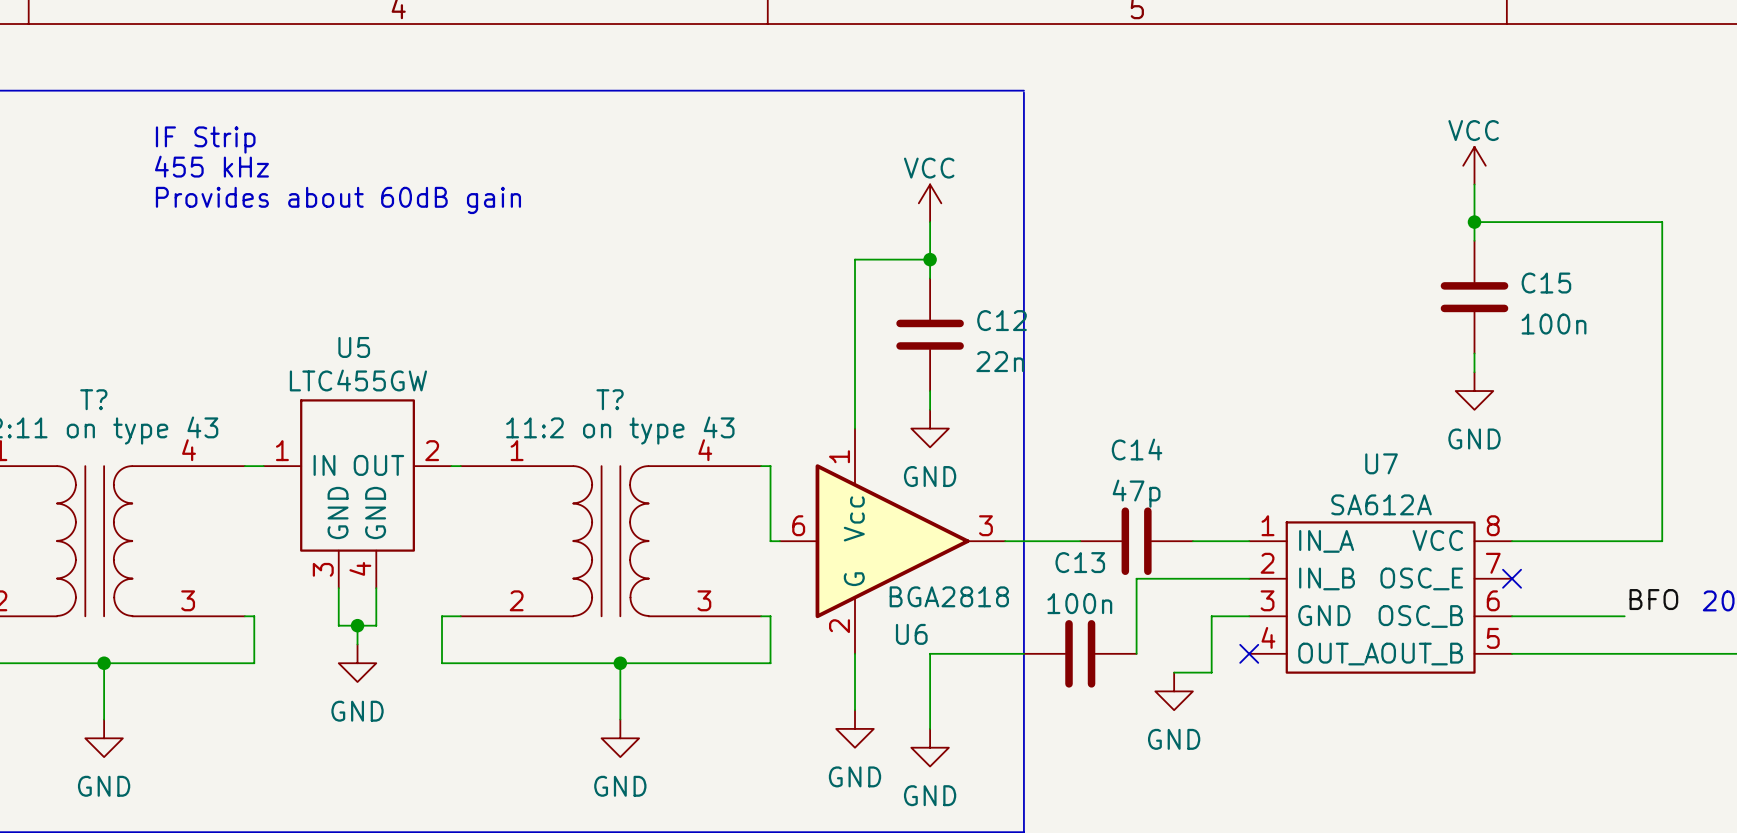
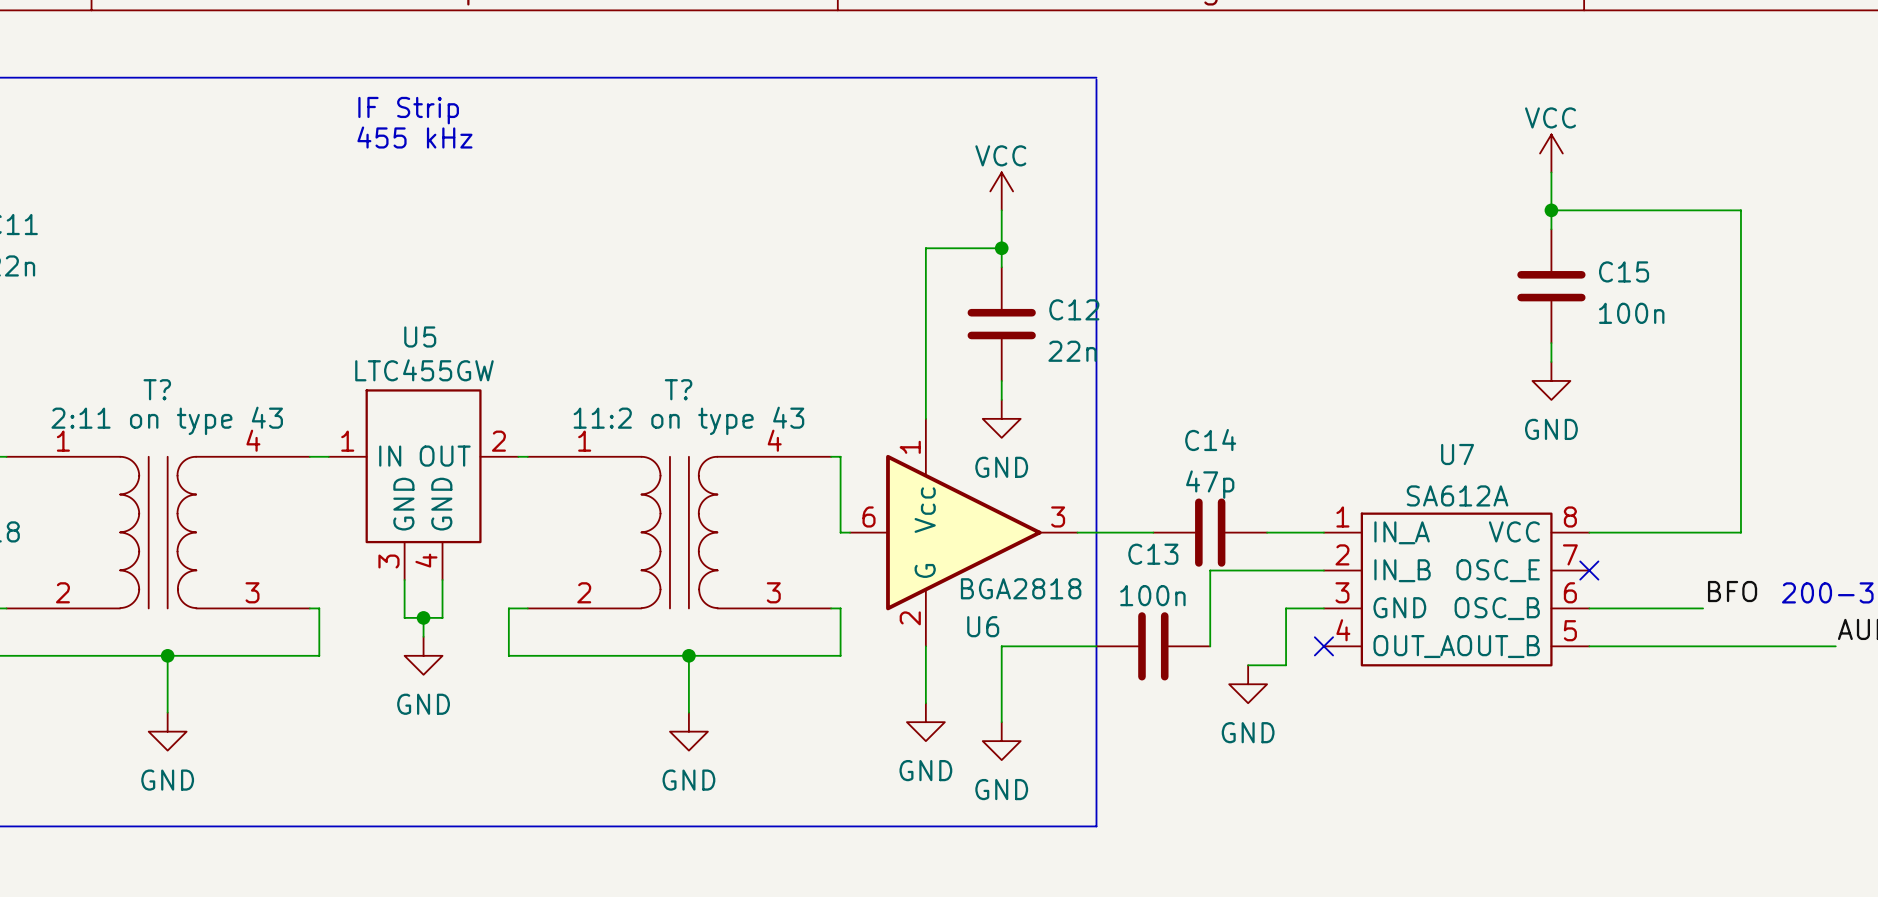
text position: IF Strip (205, 139) -> IF Strip (408, 110)
text position: 455 kHz (211, 166) -> 455 kHz (414, 137)
text: Provides about 60dB gain (338, 200) -> none

